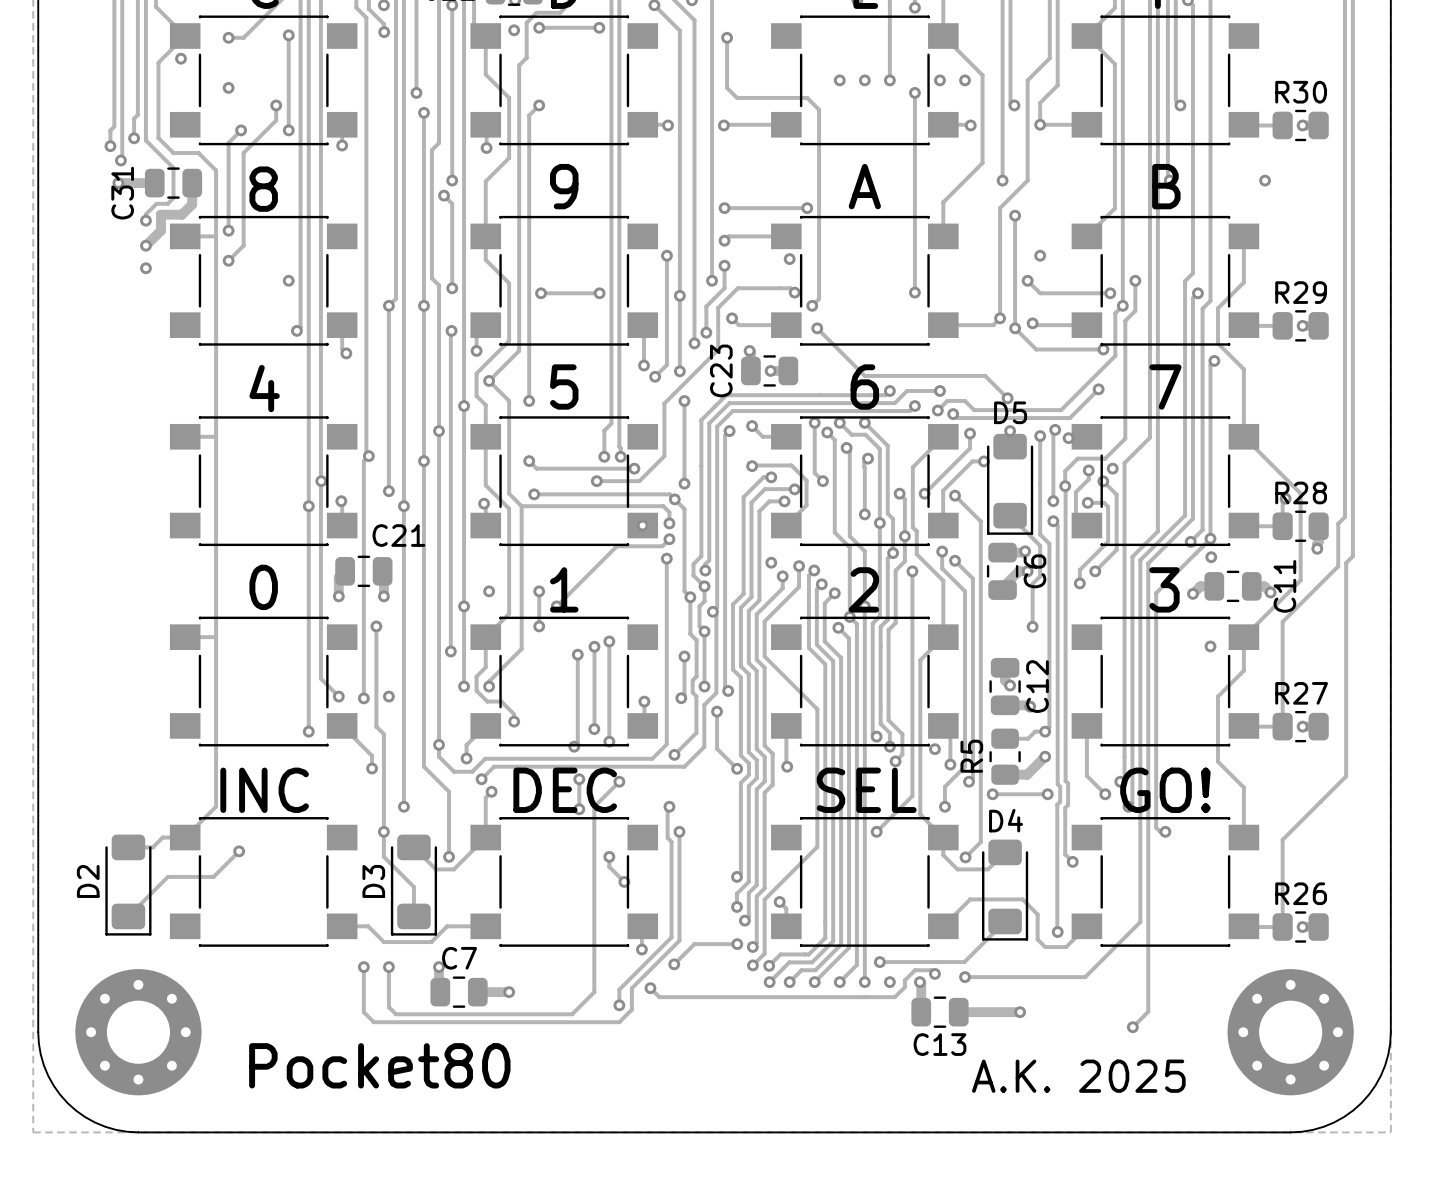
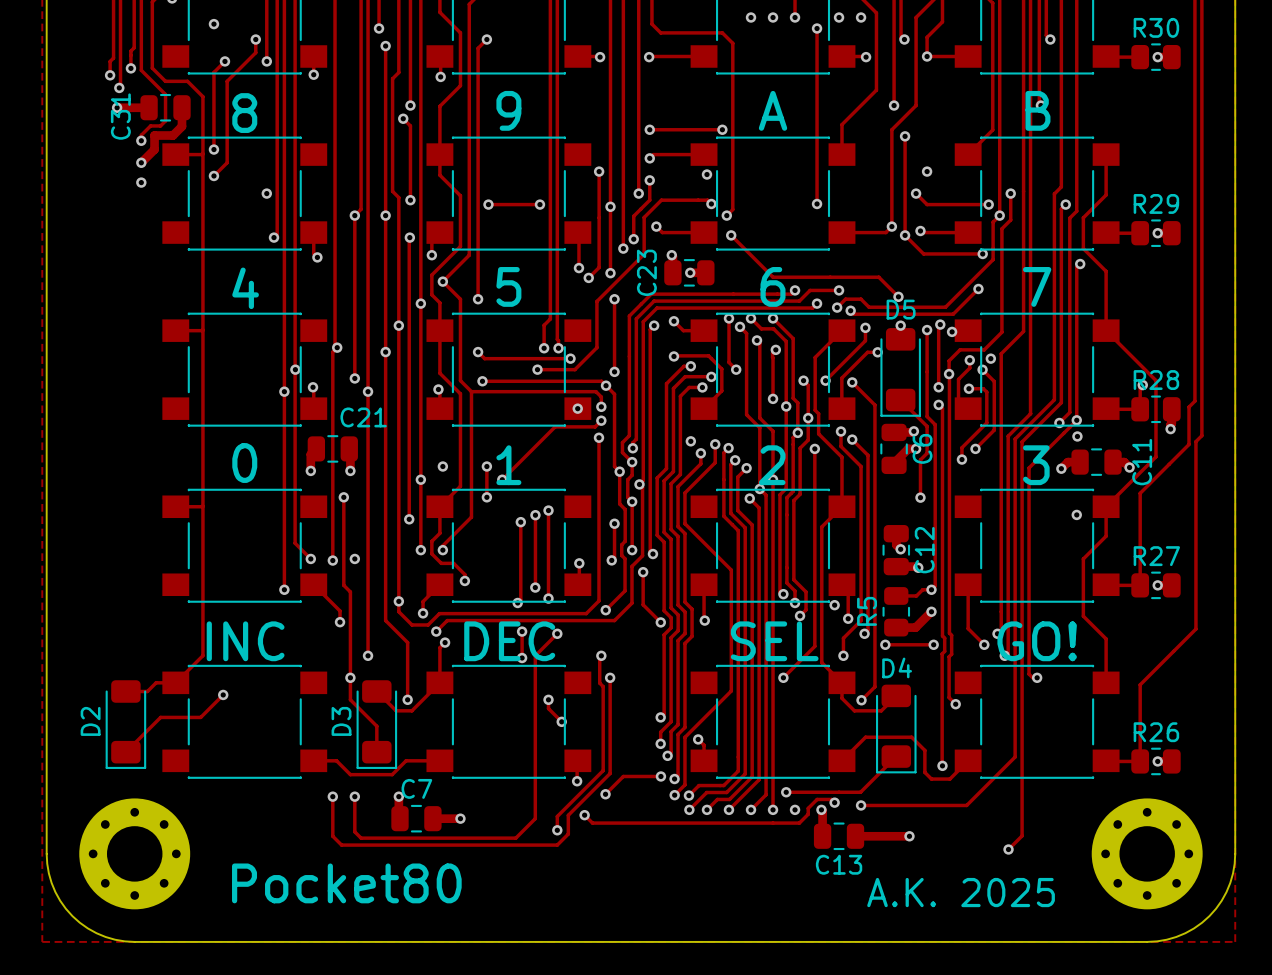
via: (1265, 180) -> none

